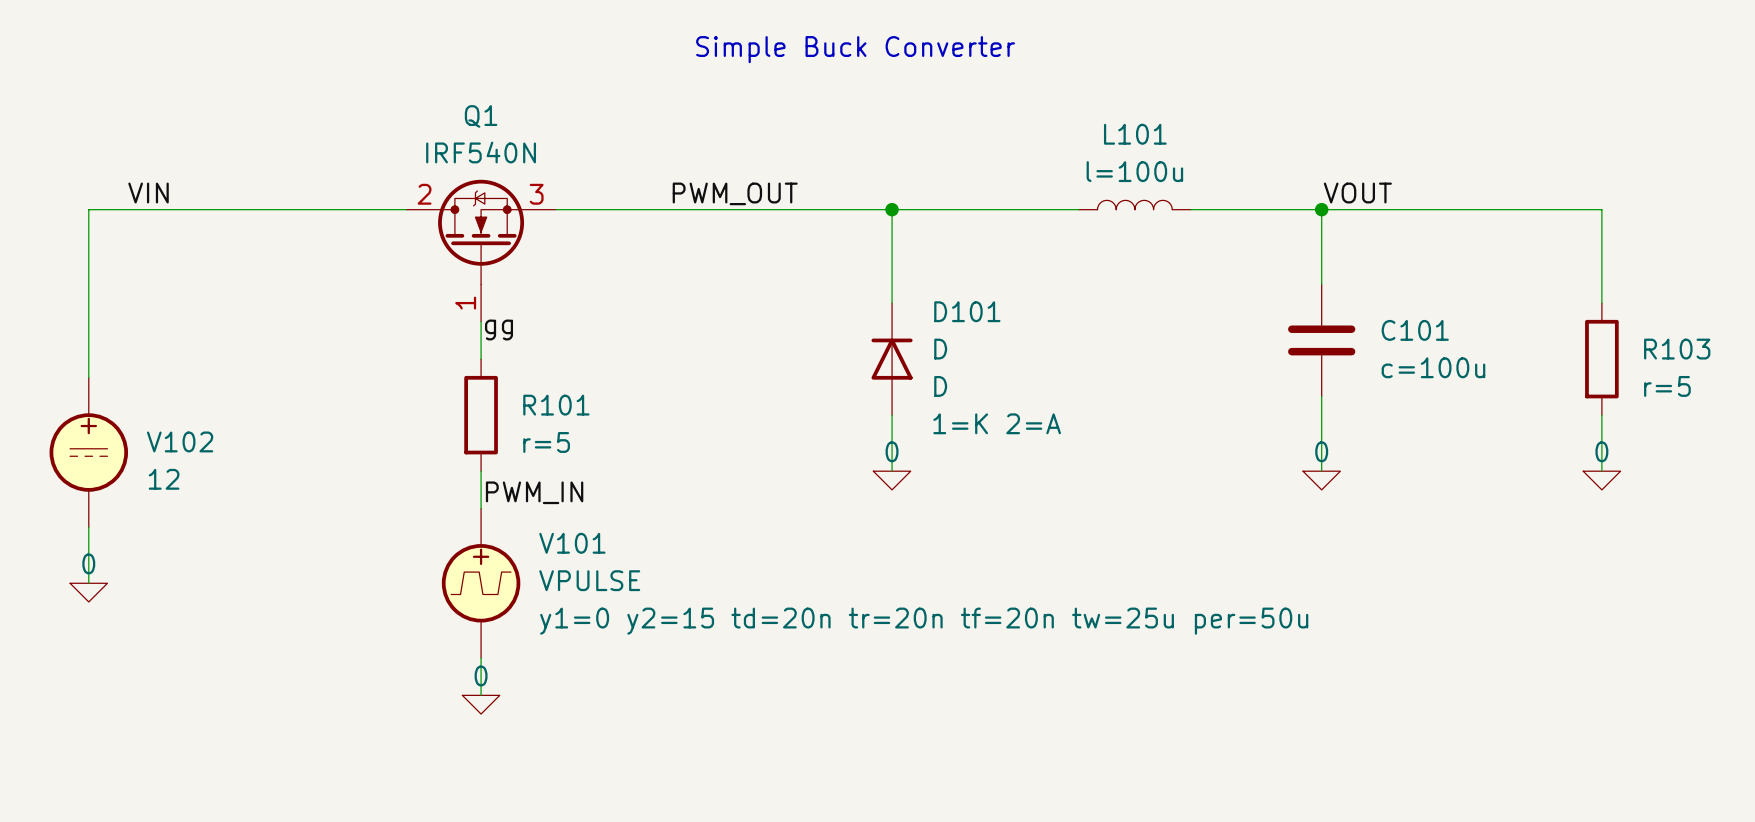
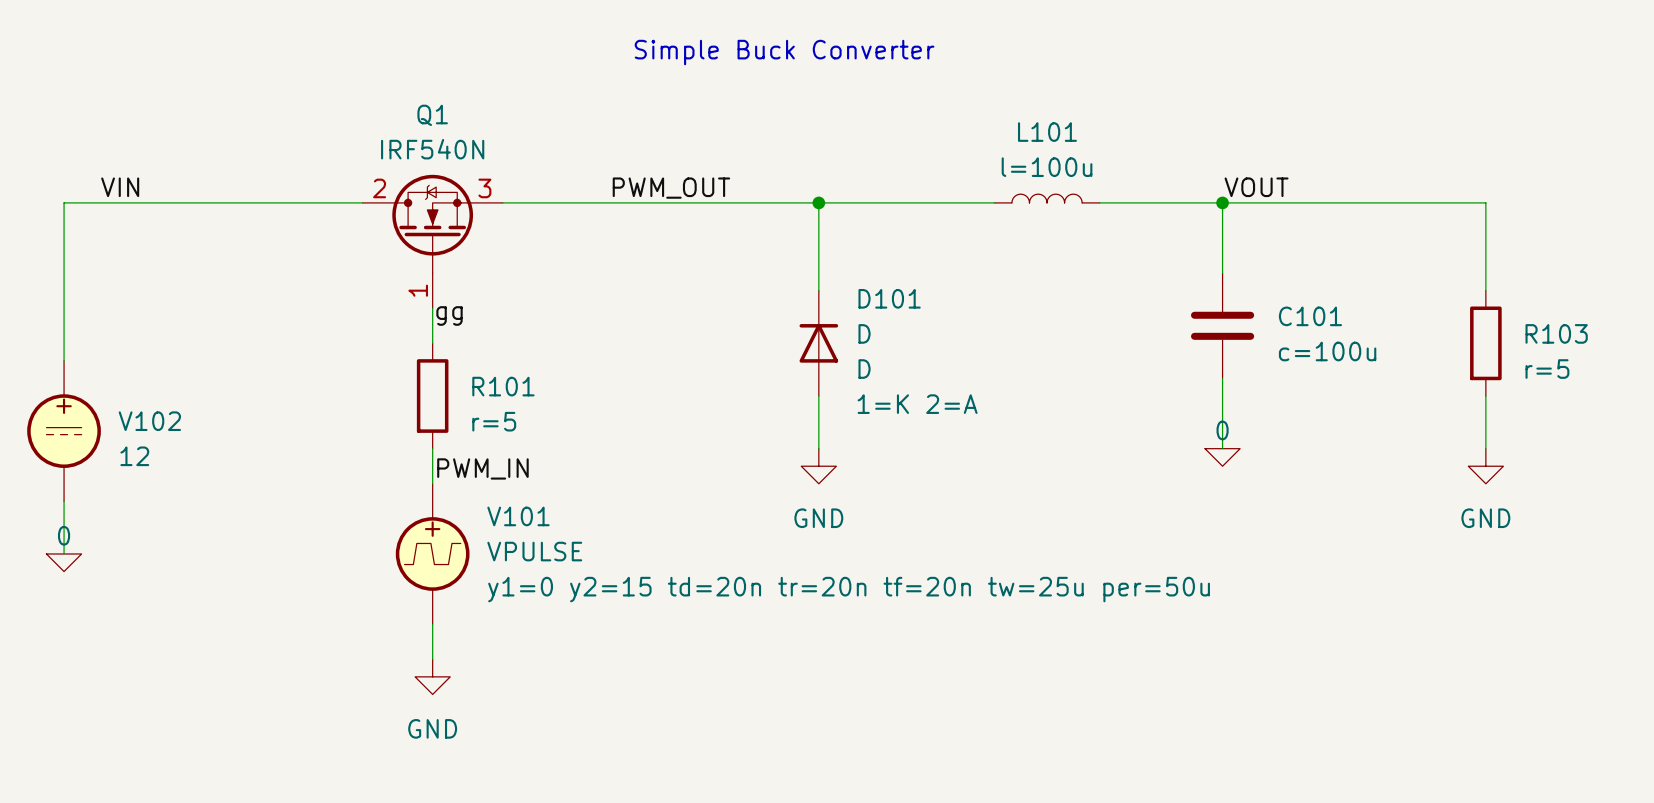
power symbol: 0 (892, 480) -> GND (818, 466)
power symbol: 0 (1601, 480) -> GND (1485, 466)
power symbol: 0 (481, 704) -> GND (432, 676)

